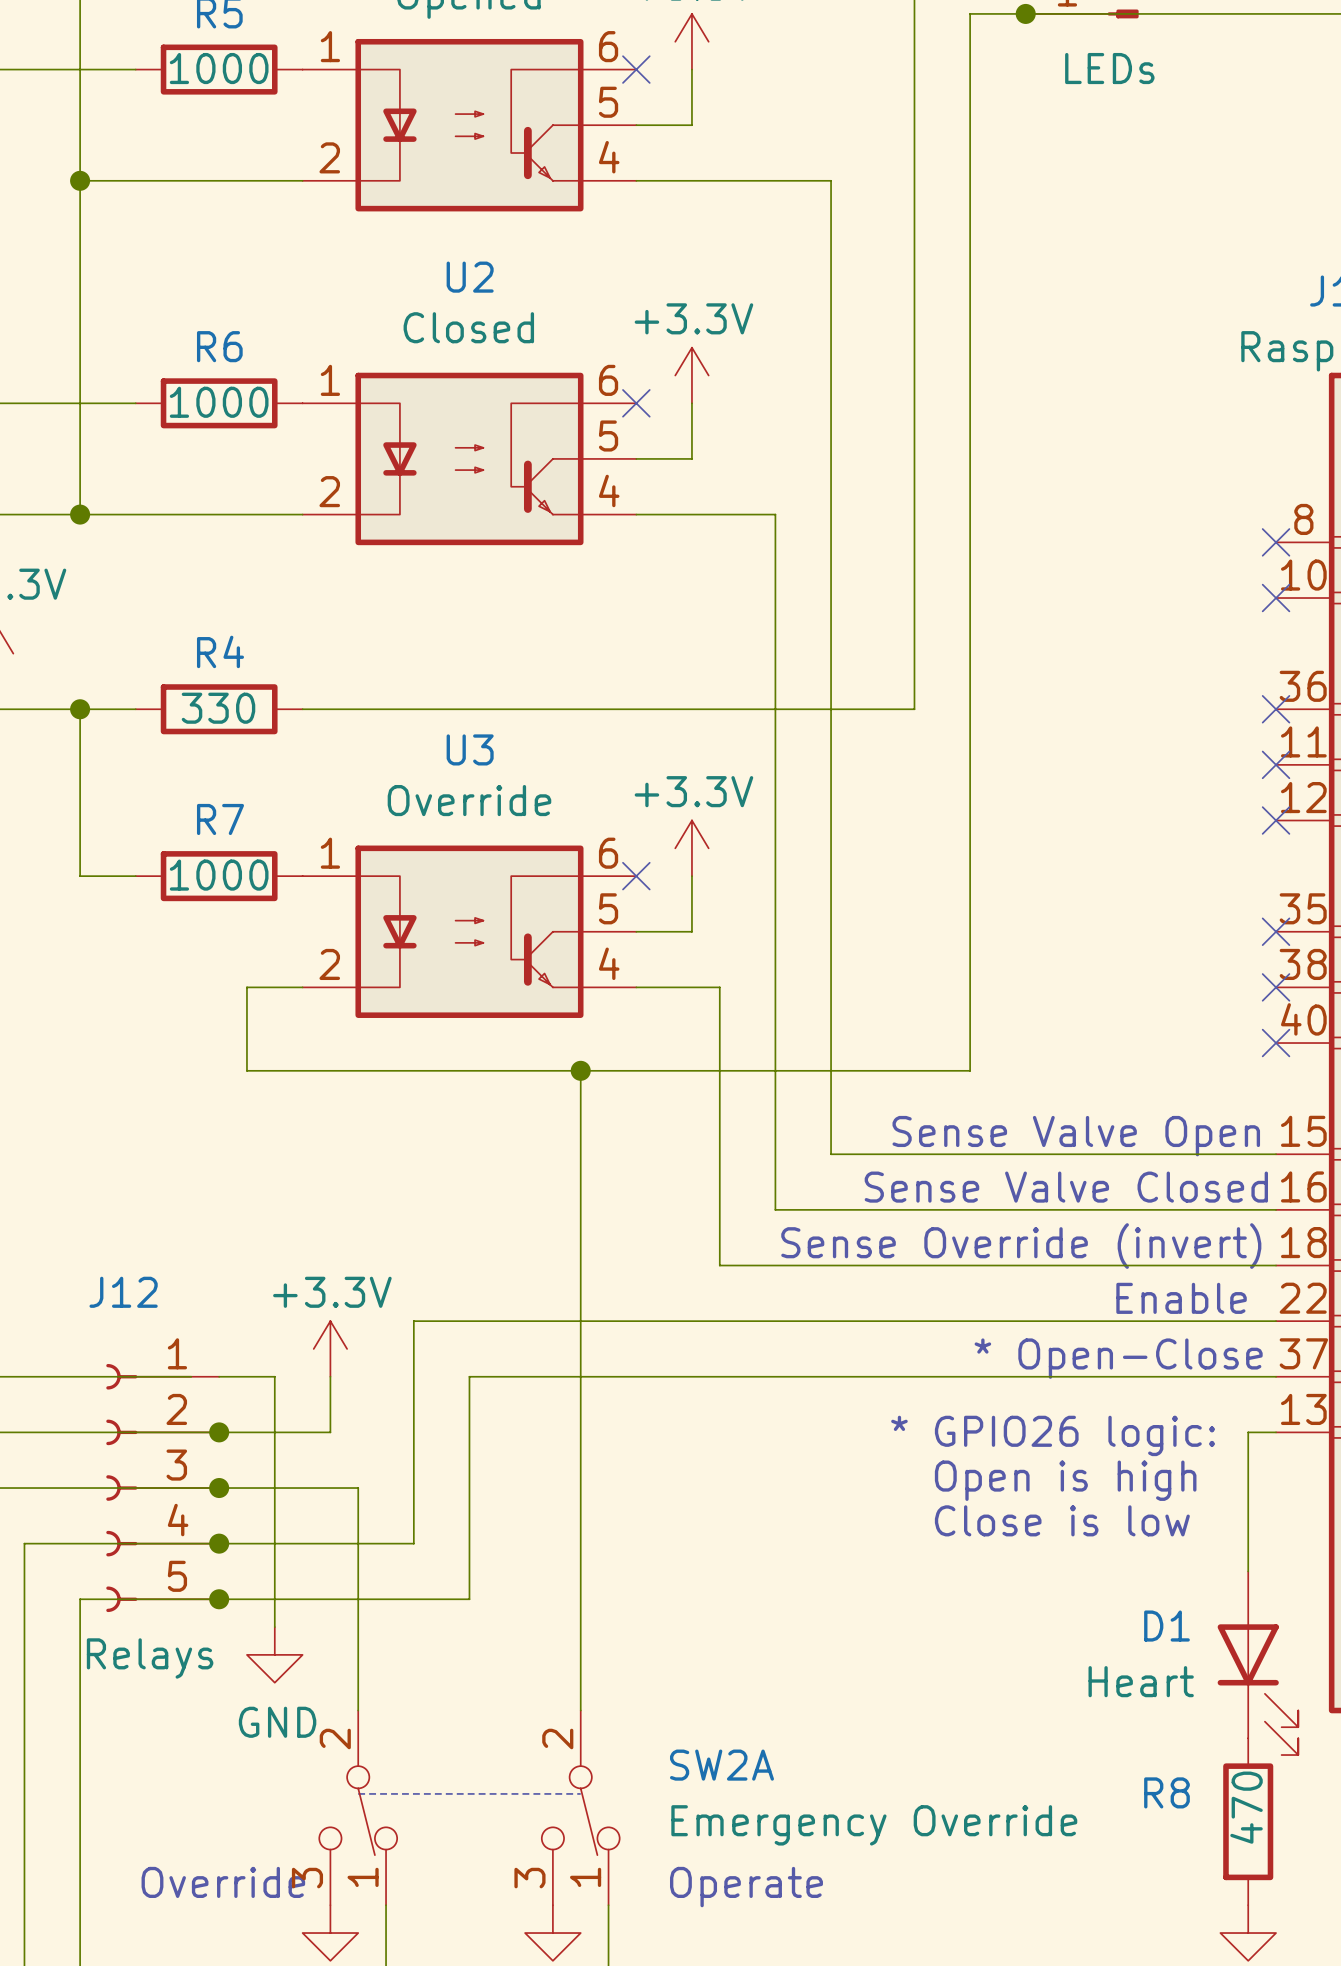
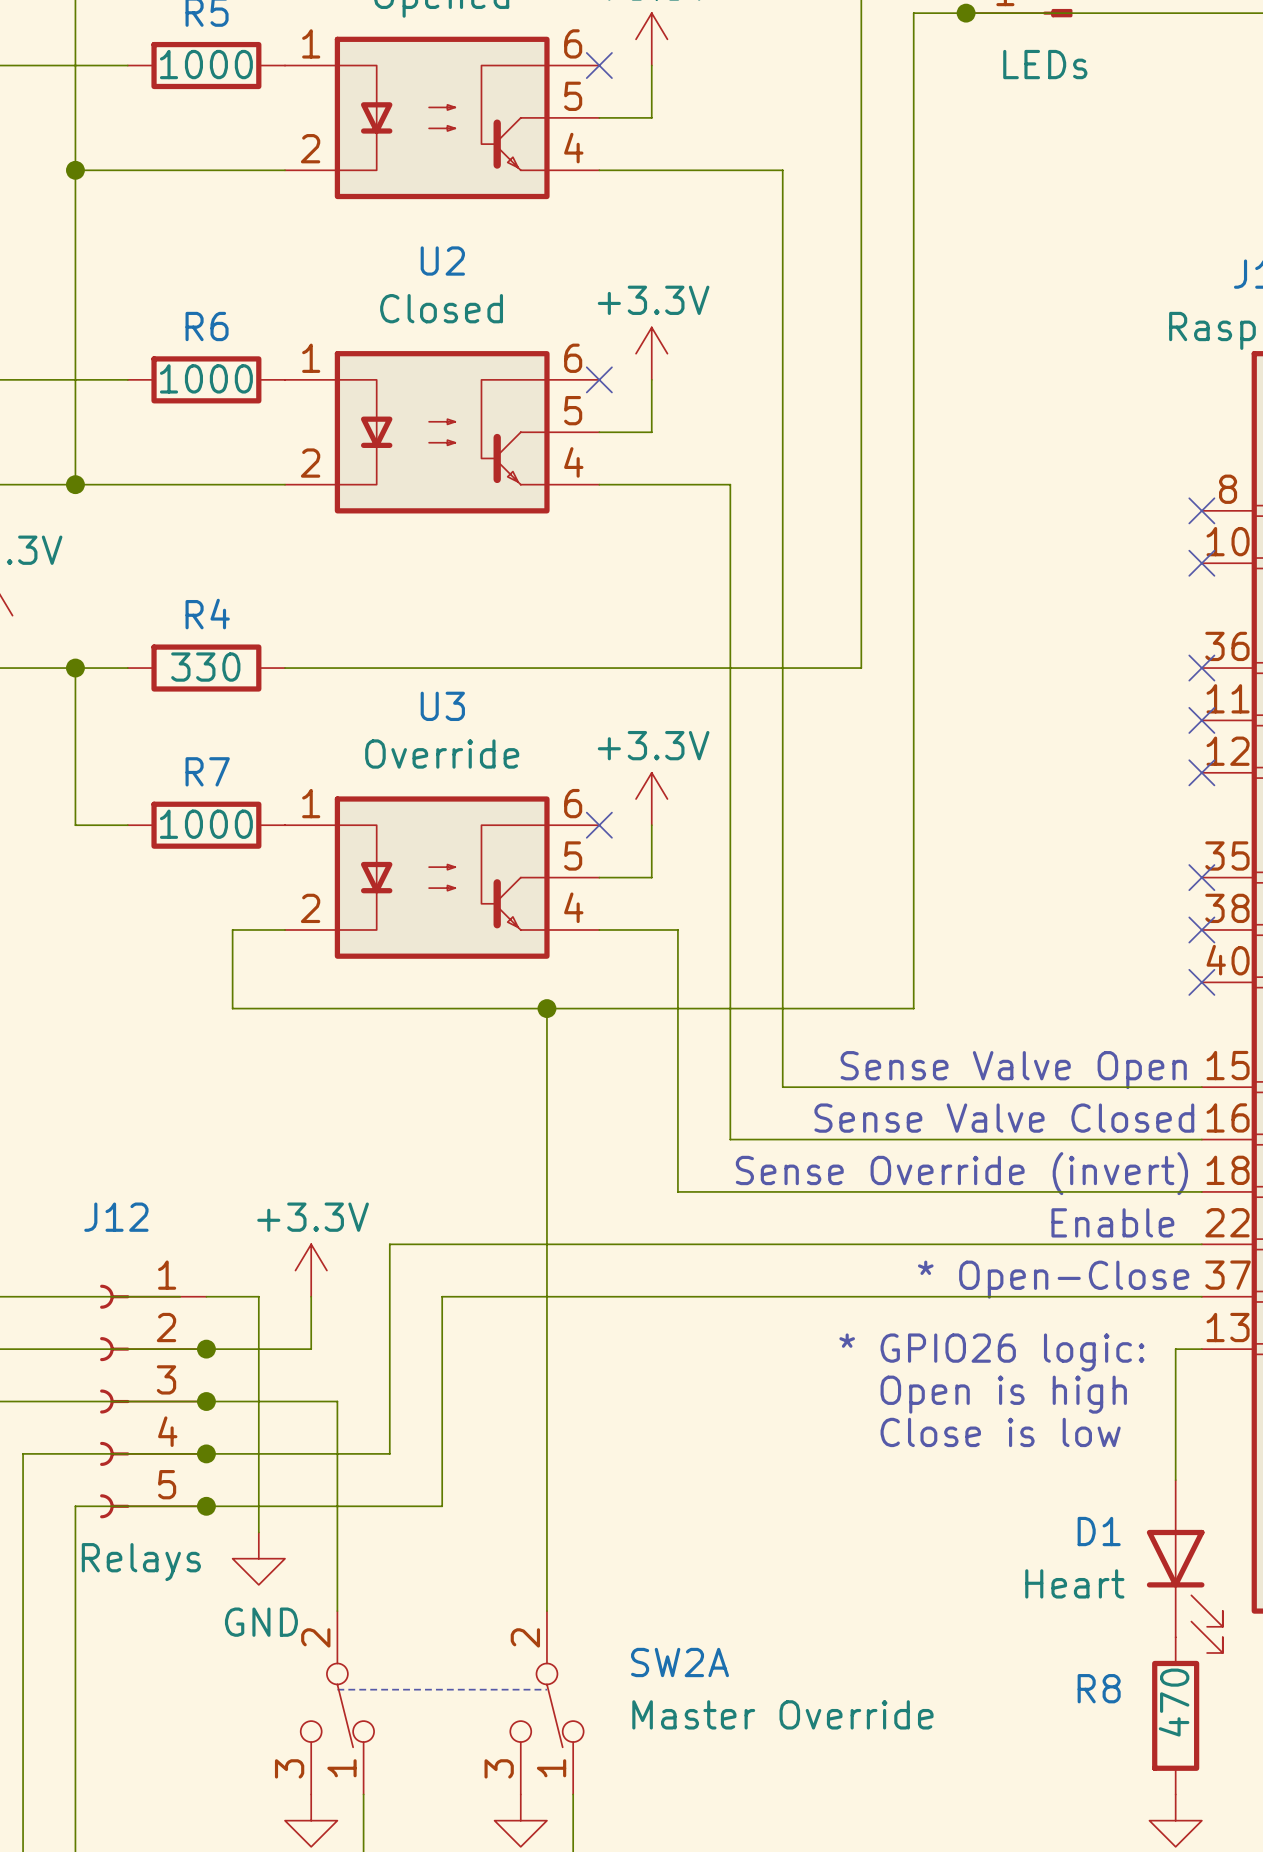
SW2A value: Emergency Override (874, 1825) -> Master Override (782, 1714)
text: Override (223, 1882) -> none
text: Operate (746, 1887) -> none

